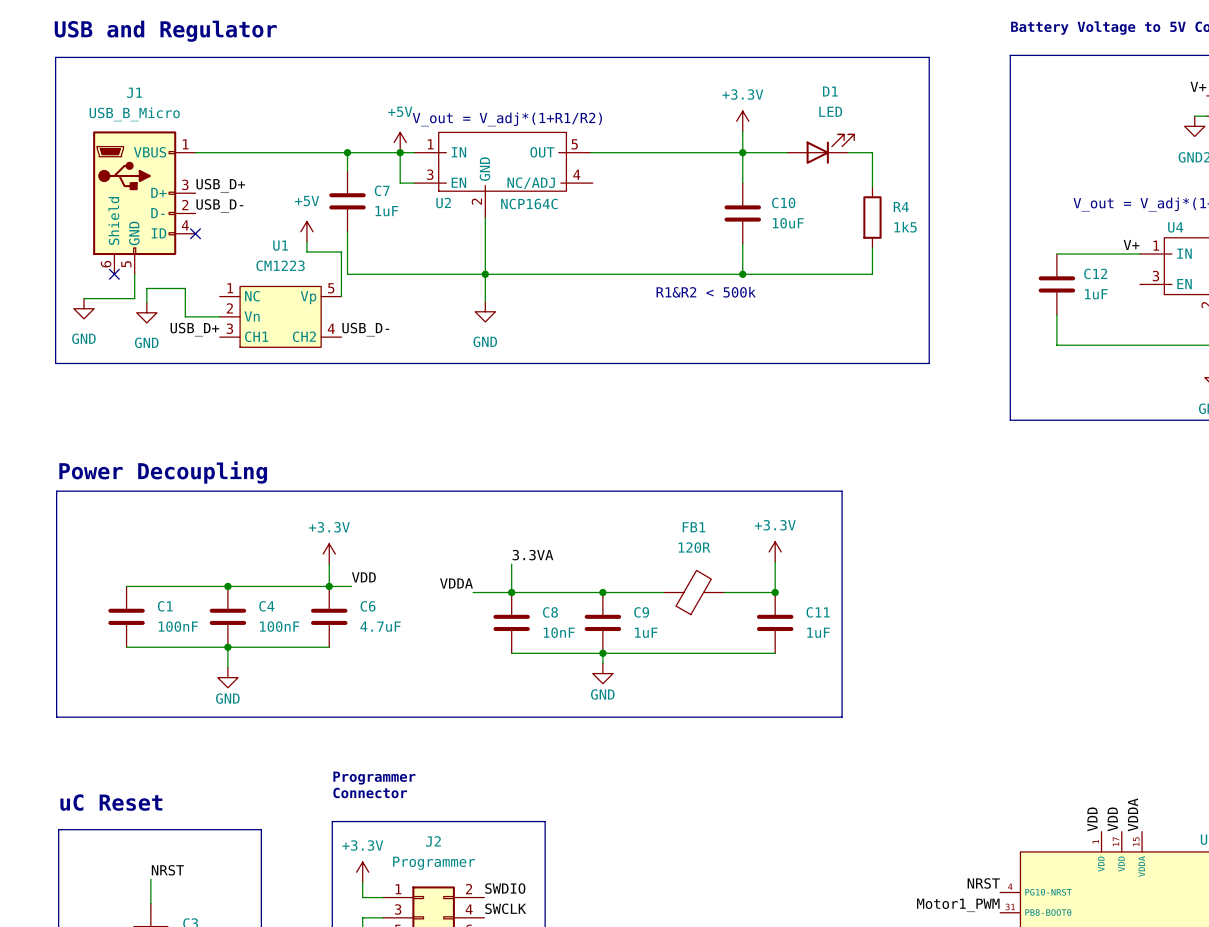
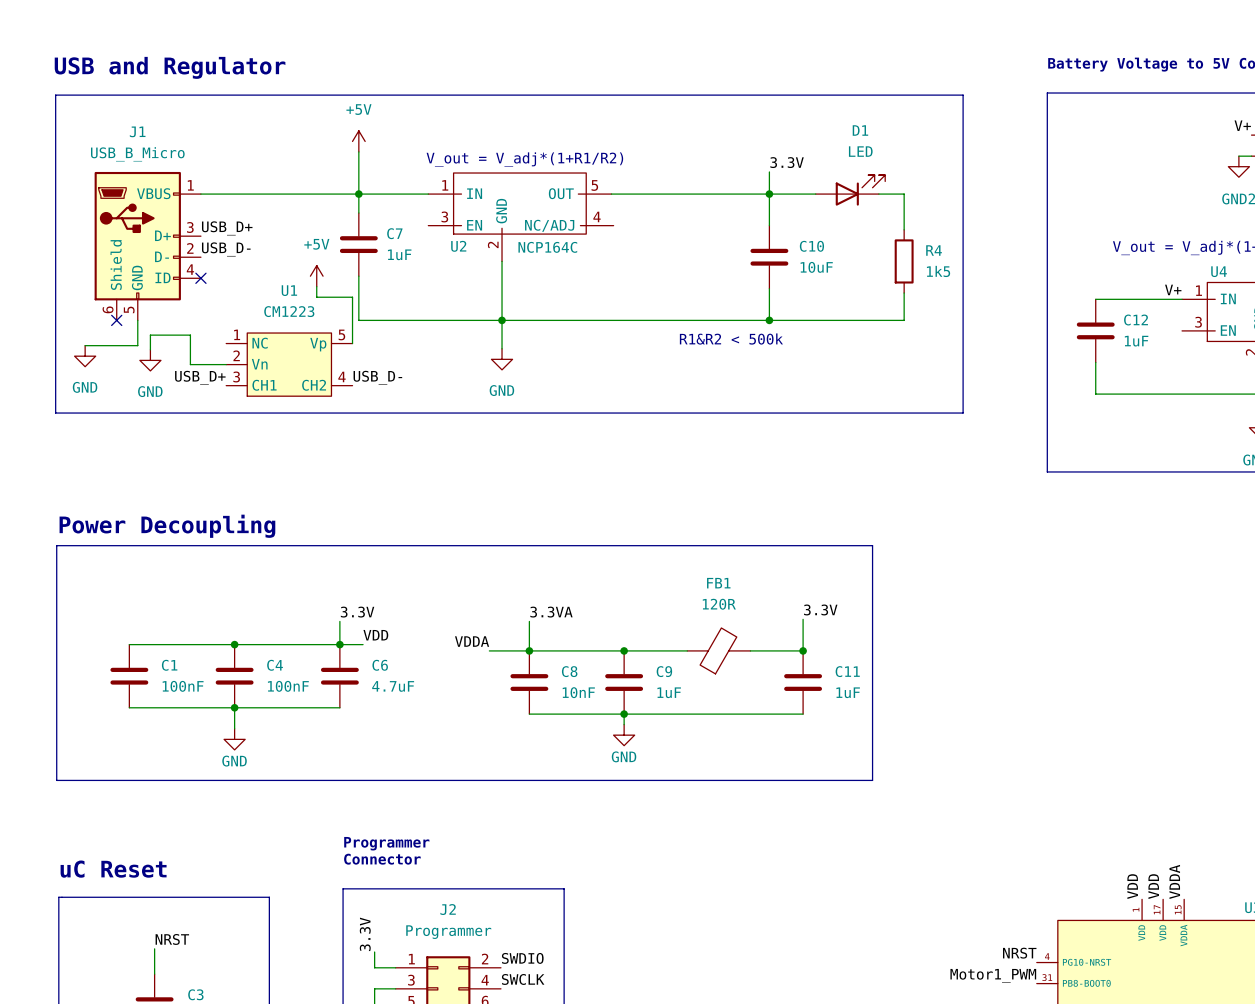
wire: none -> (358, 151) (358, 194)
power symbol: +3.3V (742, 121) -> none
label: none -> 3.3V (787, 162)
power symbol position: +5V (400, 142) -> +5V (358, 141)
wire: (400, 152) (400, 183) (414, 183) -> none
junction: (400, 152) -> none
power symbol: +3.3V (775, 551) -> none
label: none -> 3.3V (820, 609)
power symbol: +3.3V (329, 554) -> none
label: none -> 3.3V (357, 612)
label: none -> 3.3V (365, 934)
power symbol: +3.3V (362, 872) -> none

